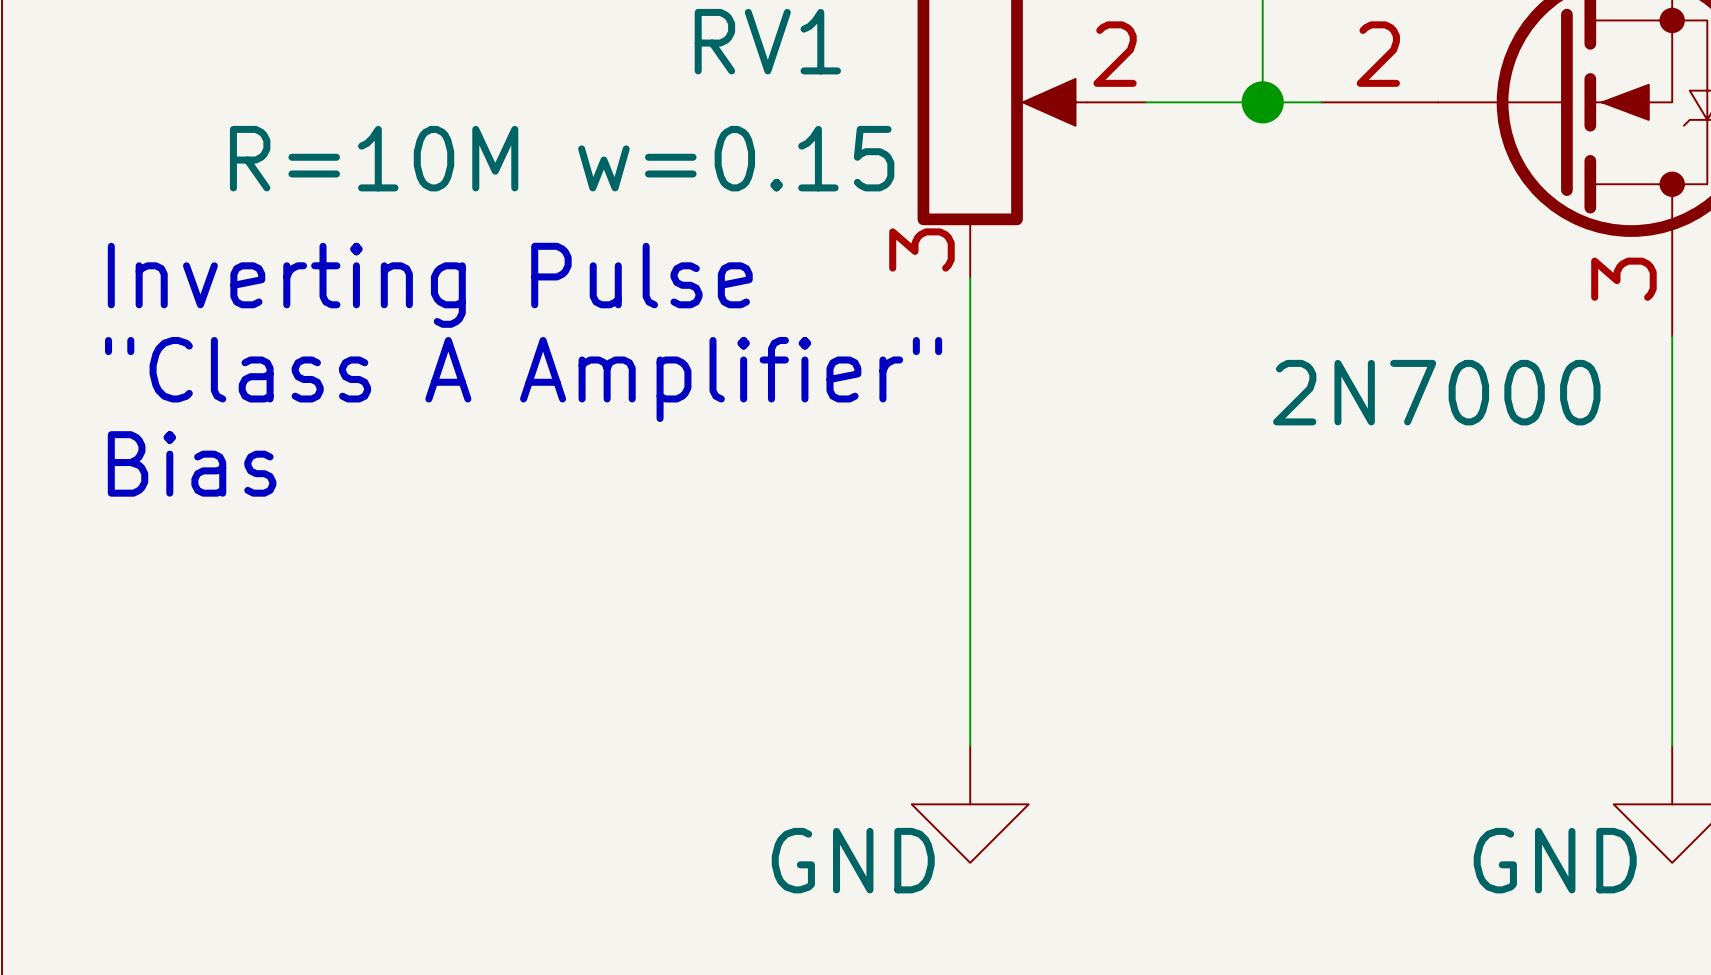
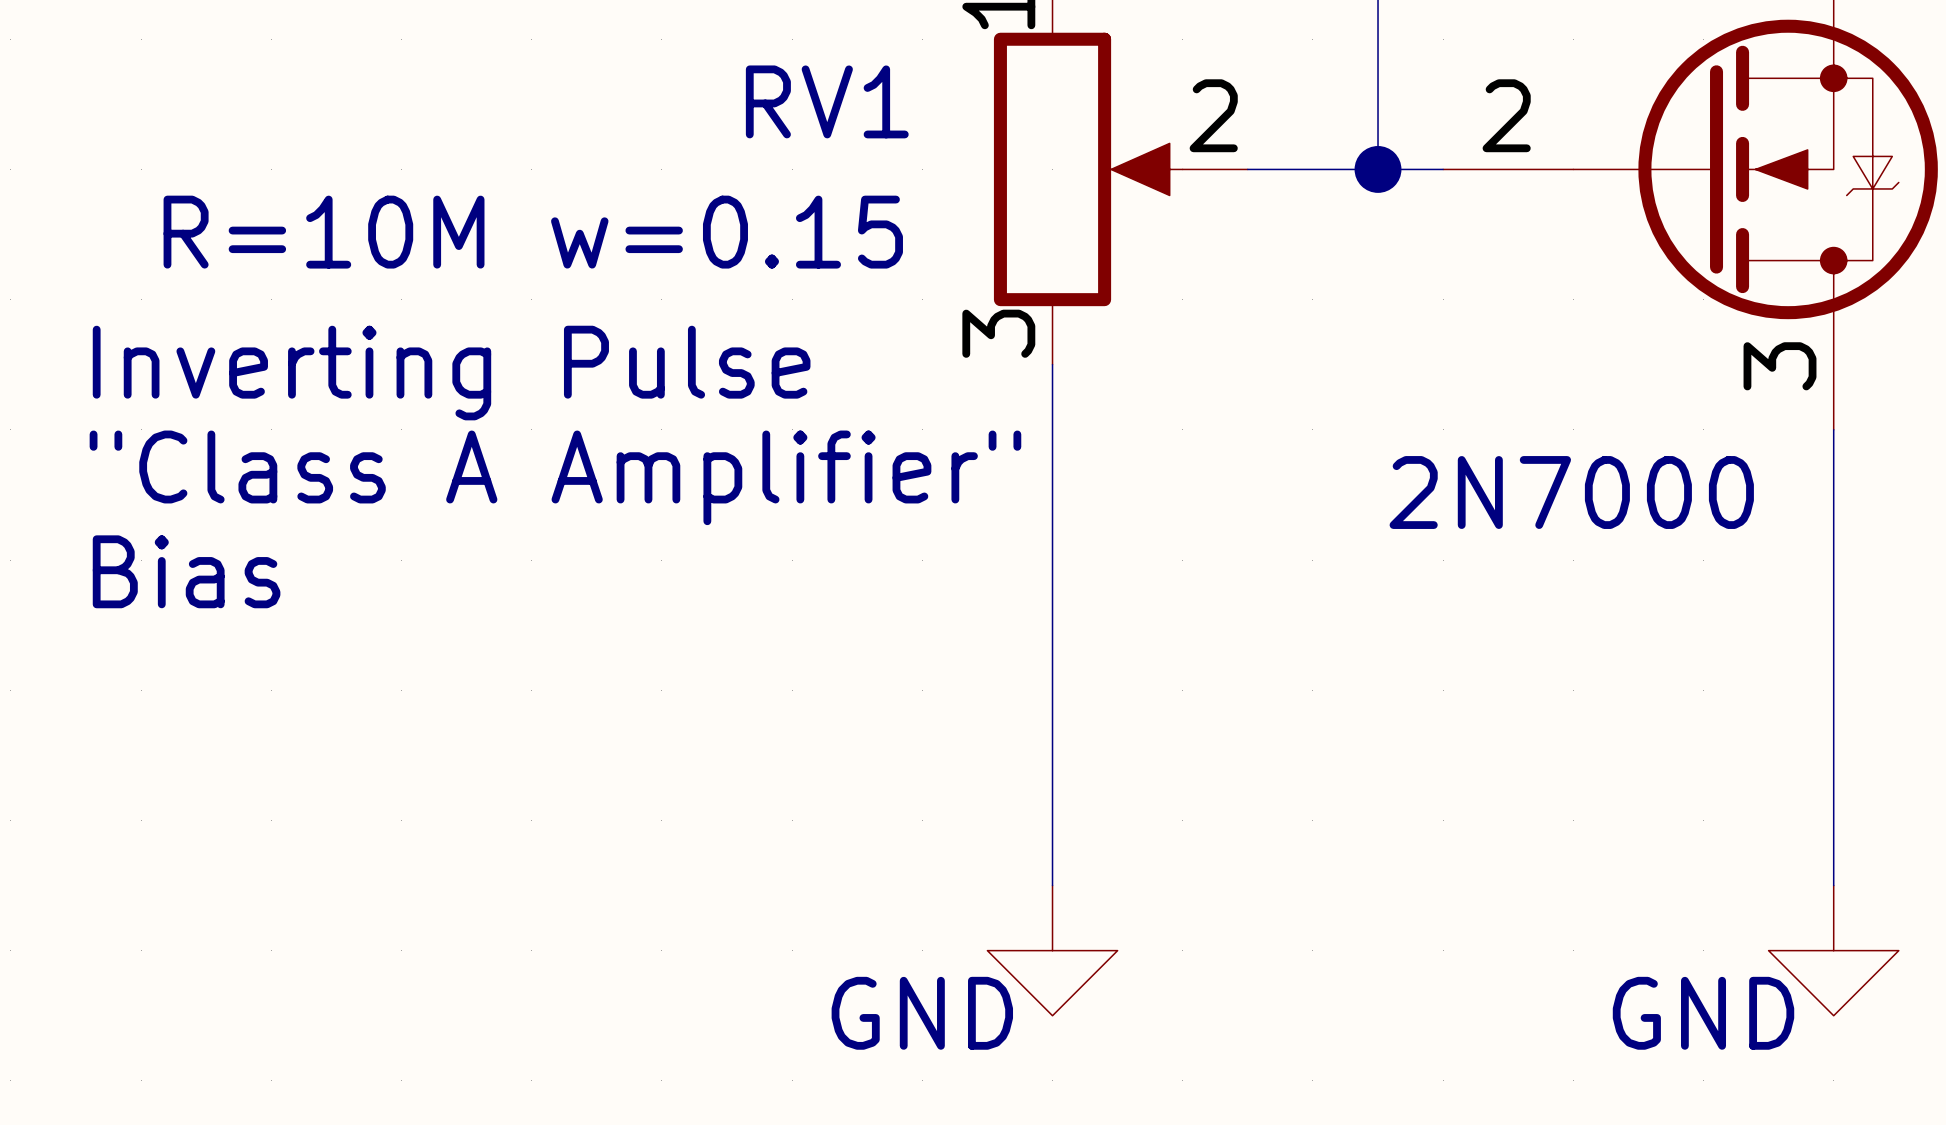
RV1 text position: R=10M w=0.15 (562, 158) -> R=10M w=0.15 (533, 232)

